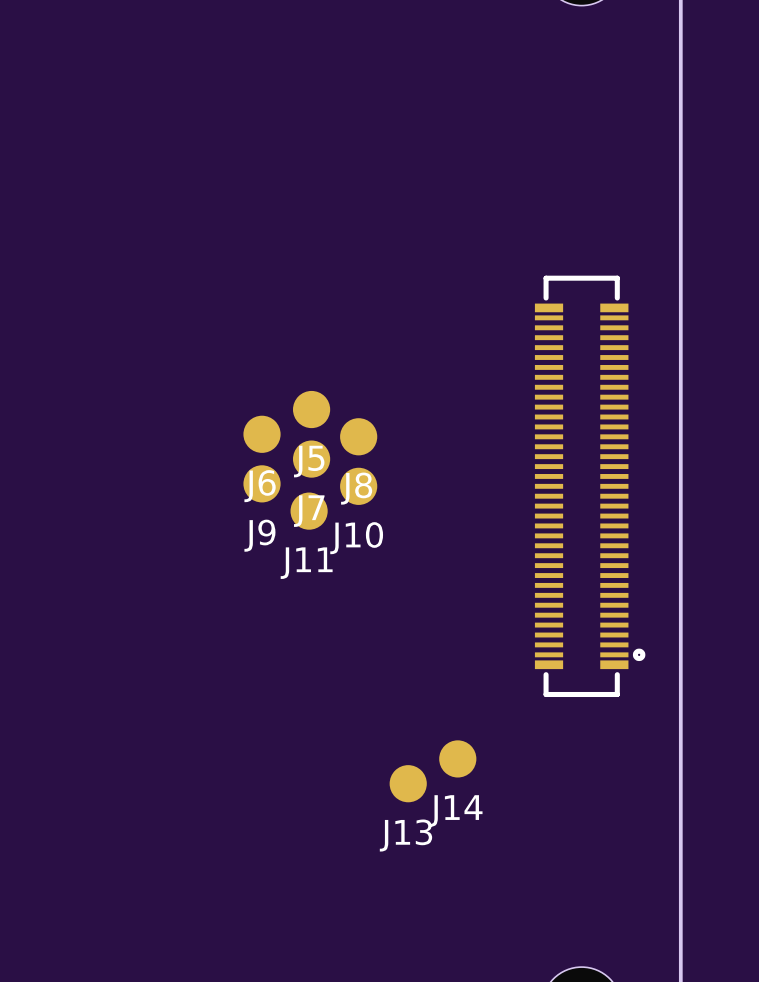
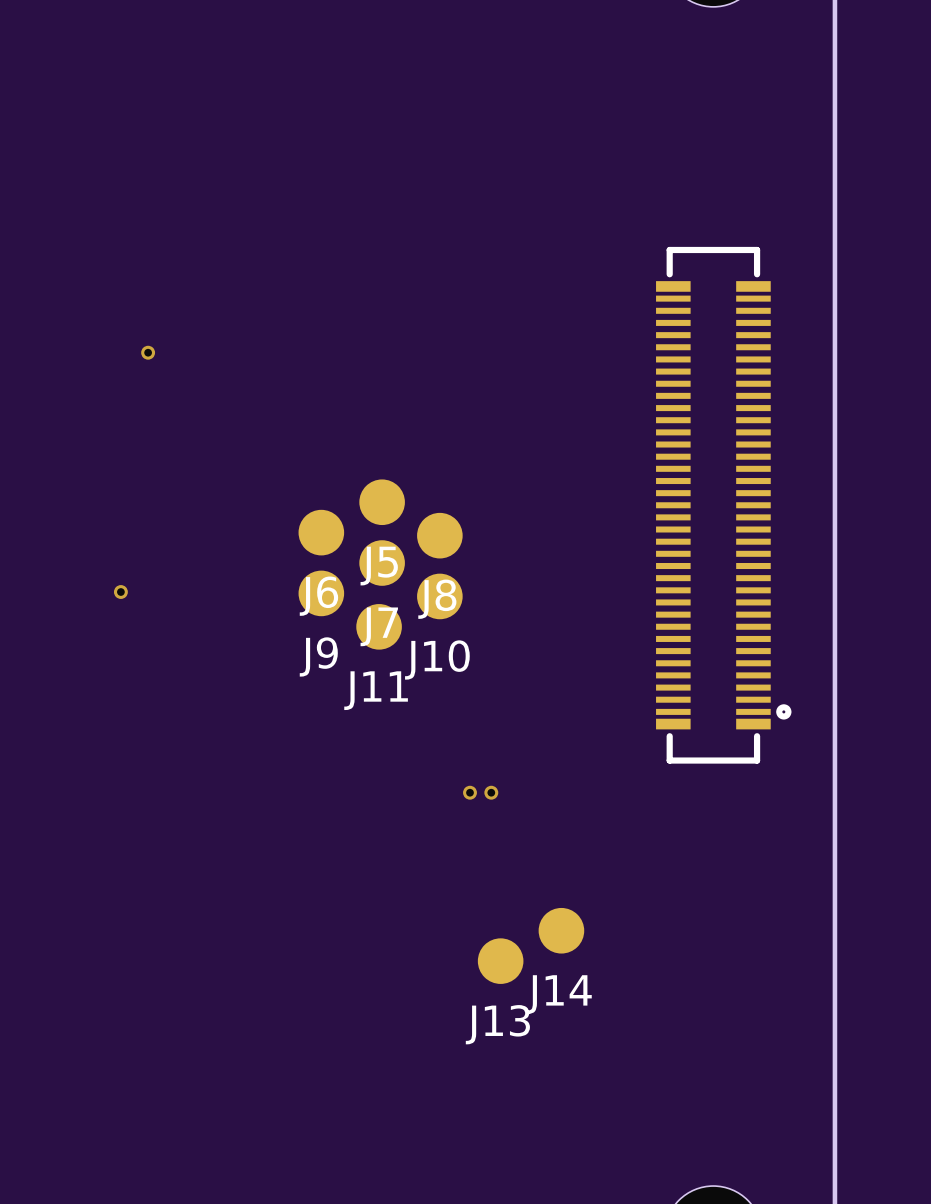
via: none -> (148, 352)
via: none -> (120, 592)
part position: (590, 486) -> (723, 505)
via: none -> (470, 792)
via: none -> (491, 792)

